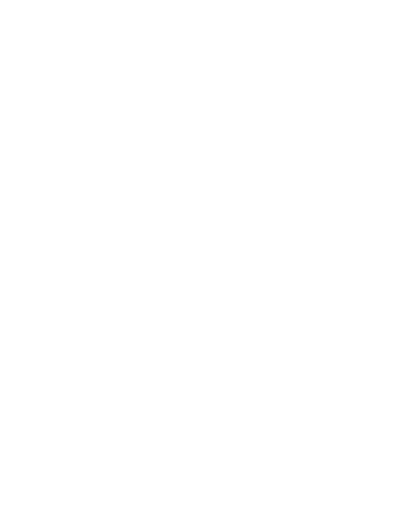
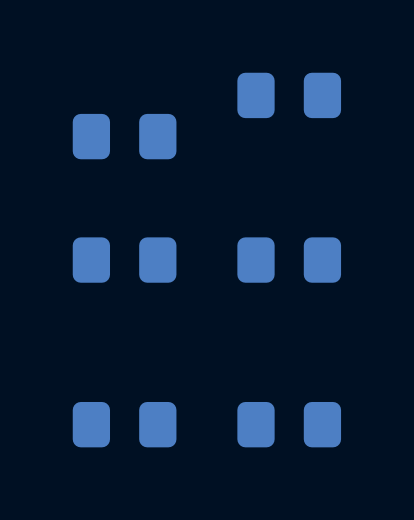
part: none -> (289, 95)
part: none -> (124, 136)
part: none -> (124, 260)
part: none -> (289, 260)
part: none -> (124, 424)
part: none -> (289, 424)

